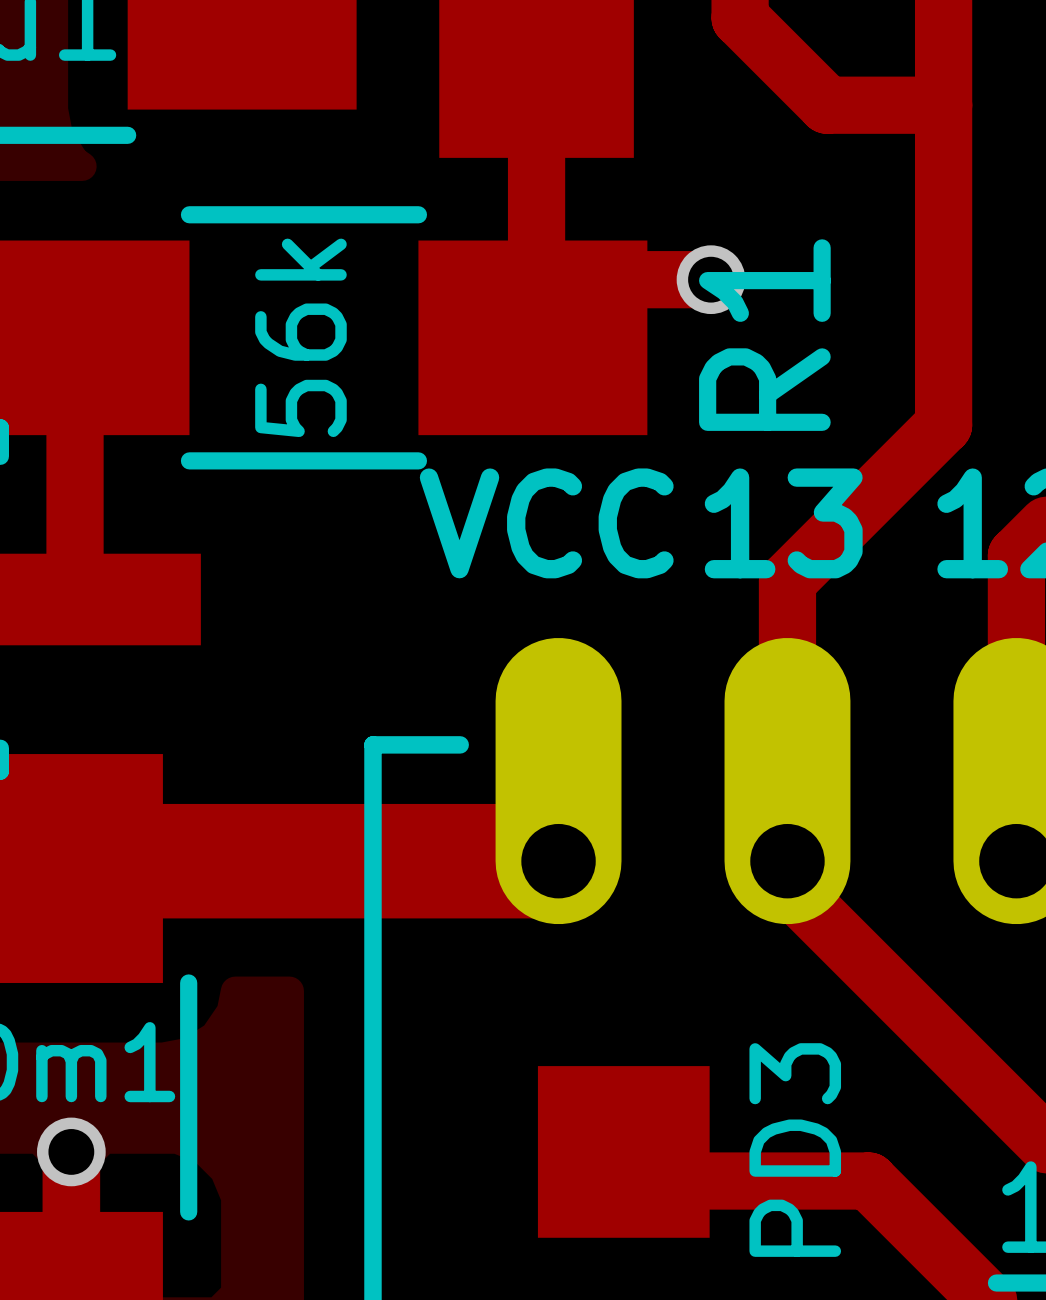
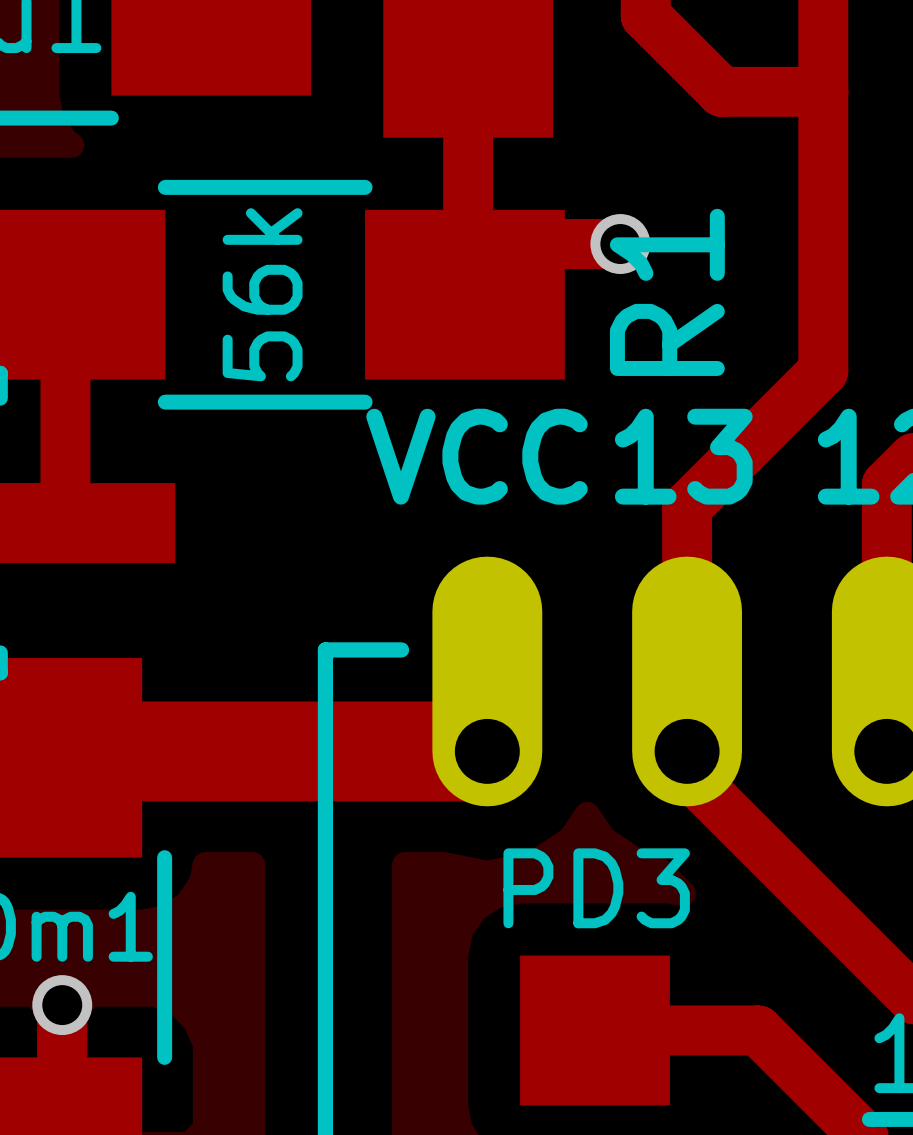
text rotation: 0° (795, 1150) -> 90° clockwise (596, 888)
part position: (623, 1151) -> (594, 1030)

